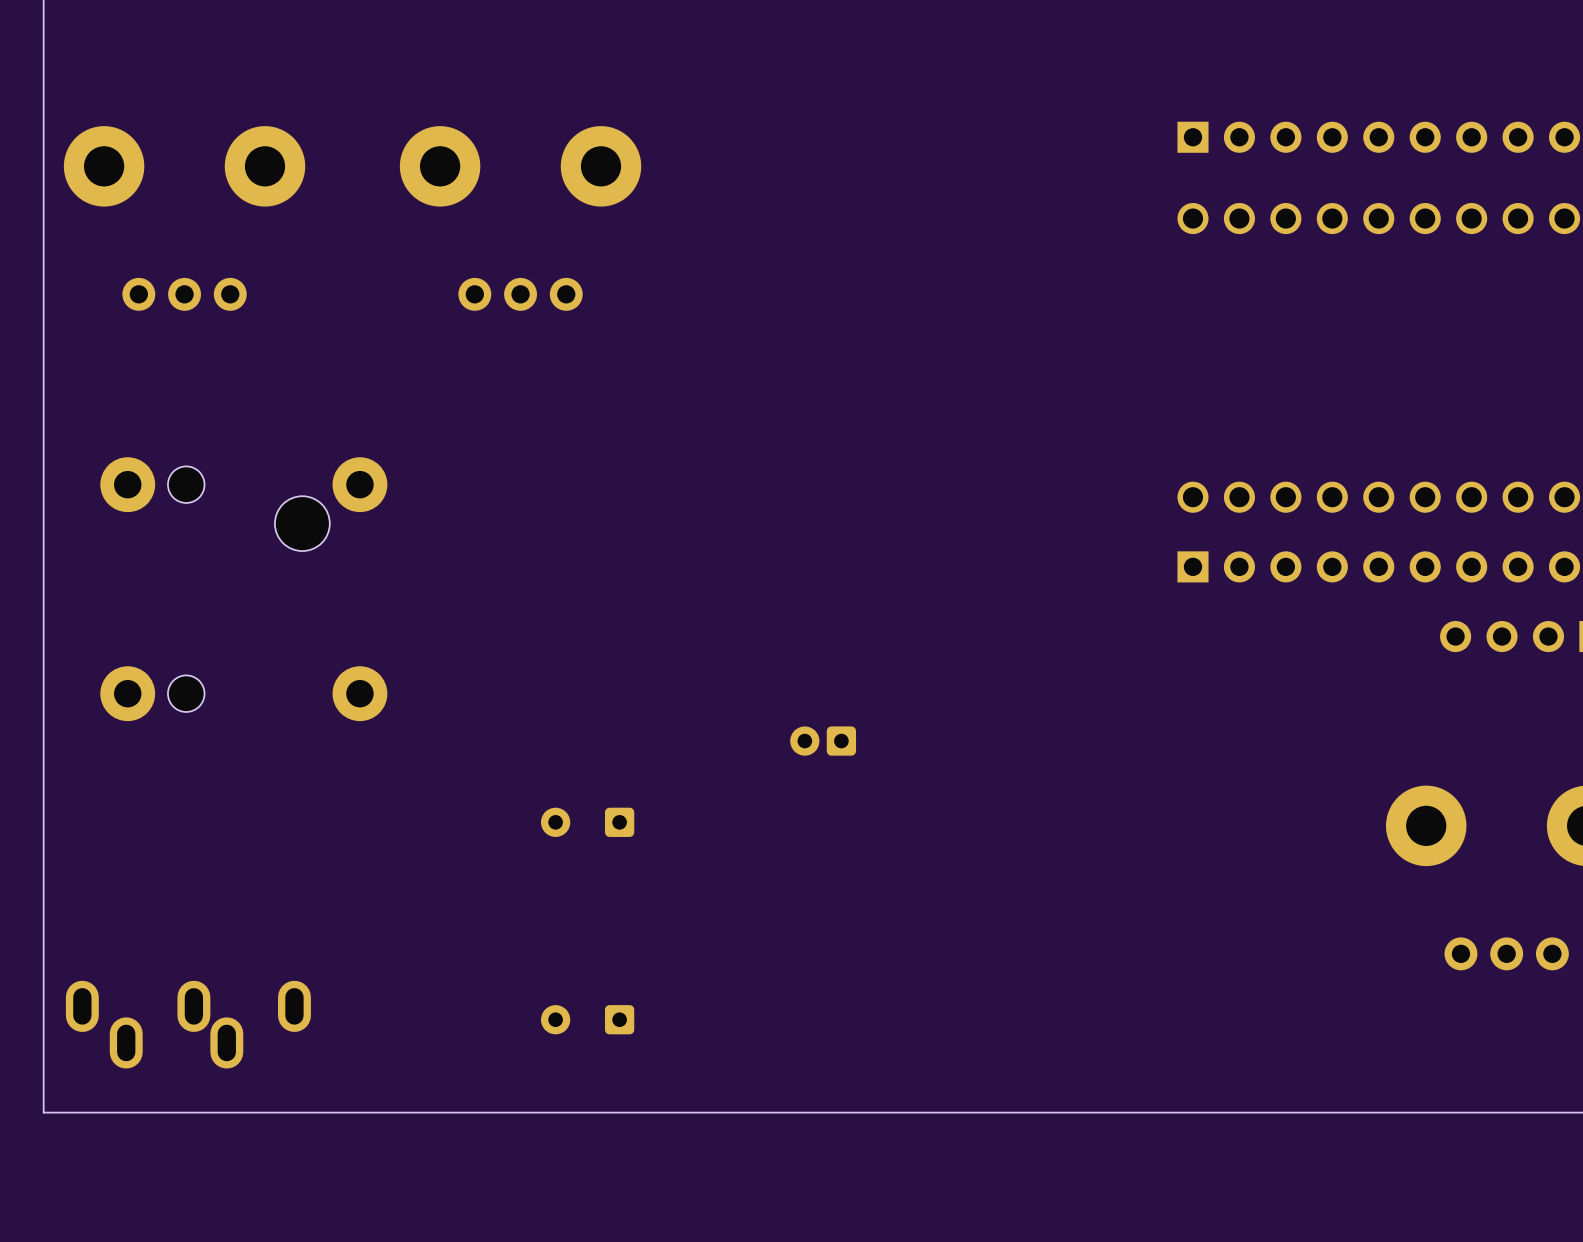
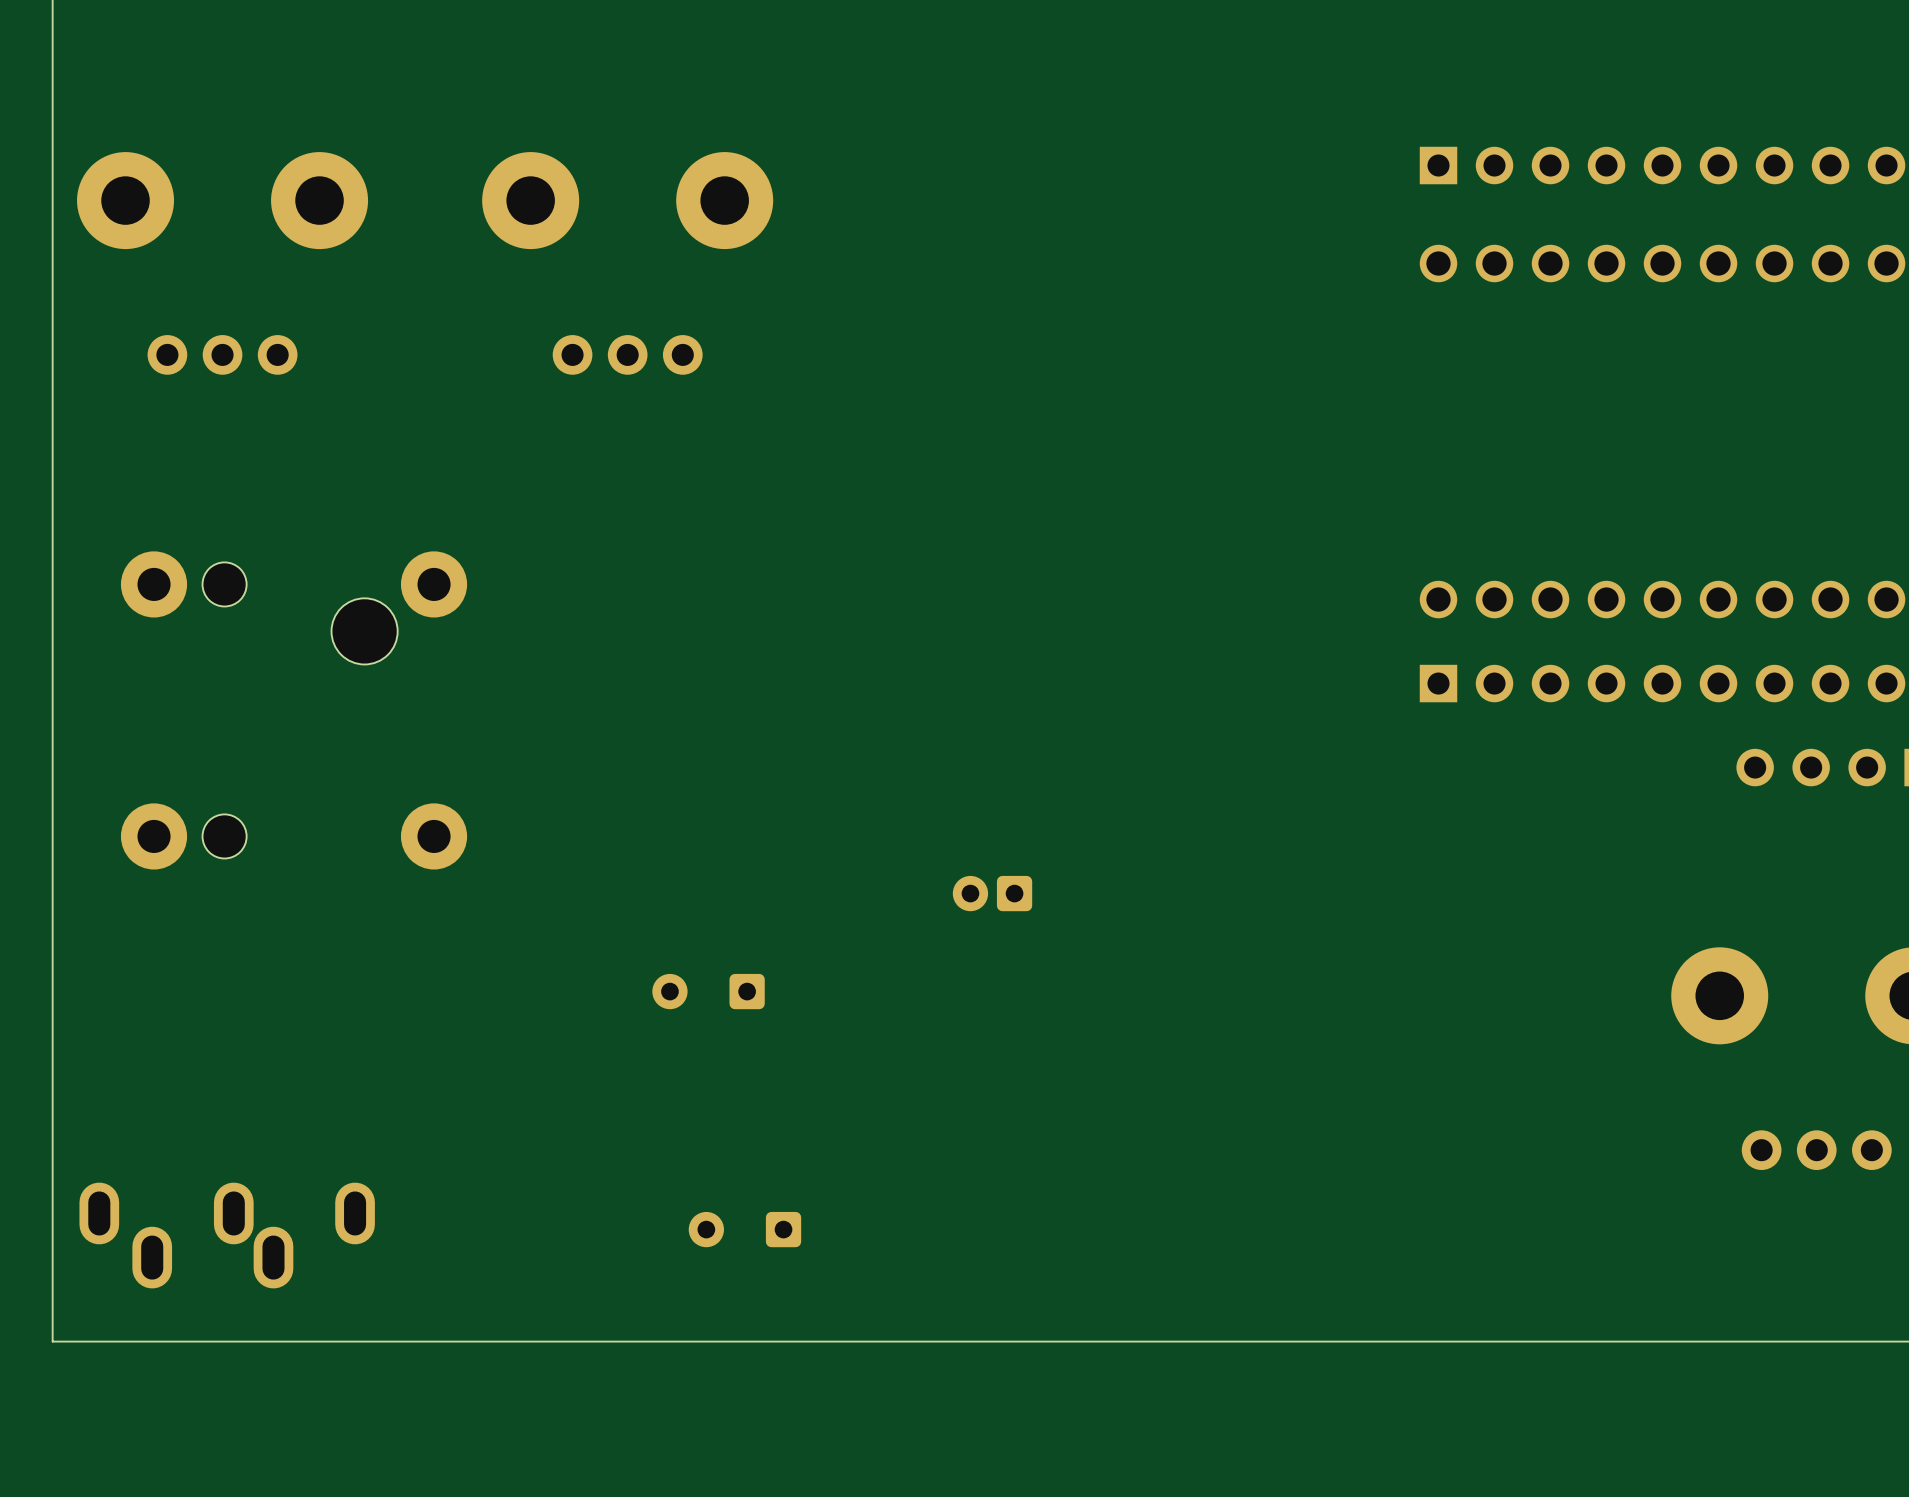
part position: (587, 1019) -> (744, 1229)

